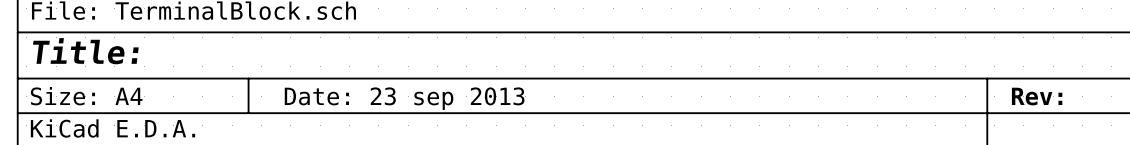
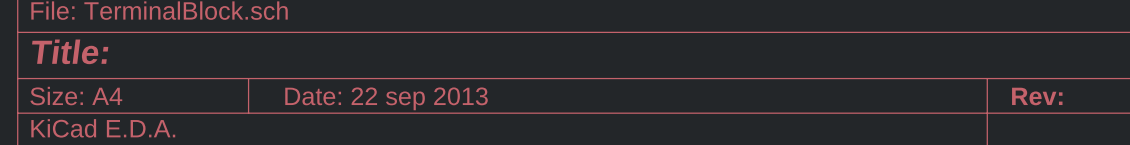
title block: Date: 23 sep 2013 (404, 98) -> Date: 22 sep 2013 (386, 98)

